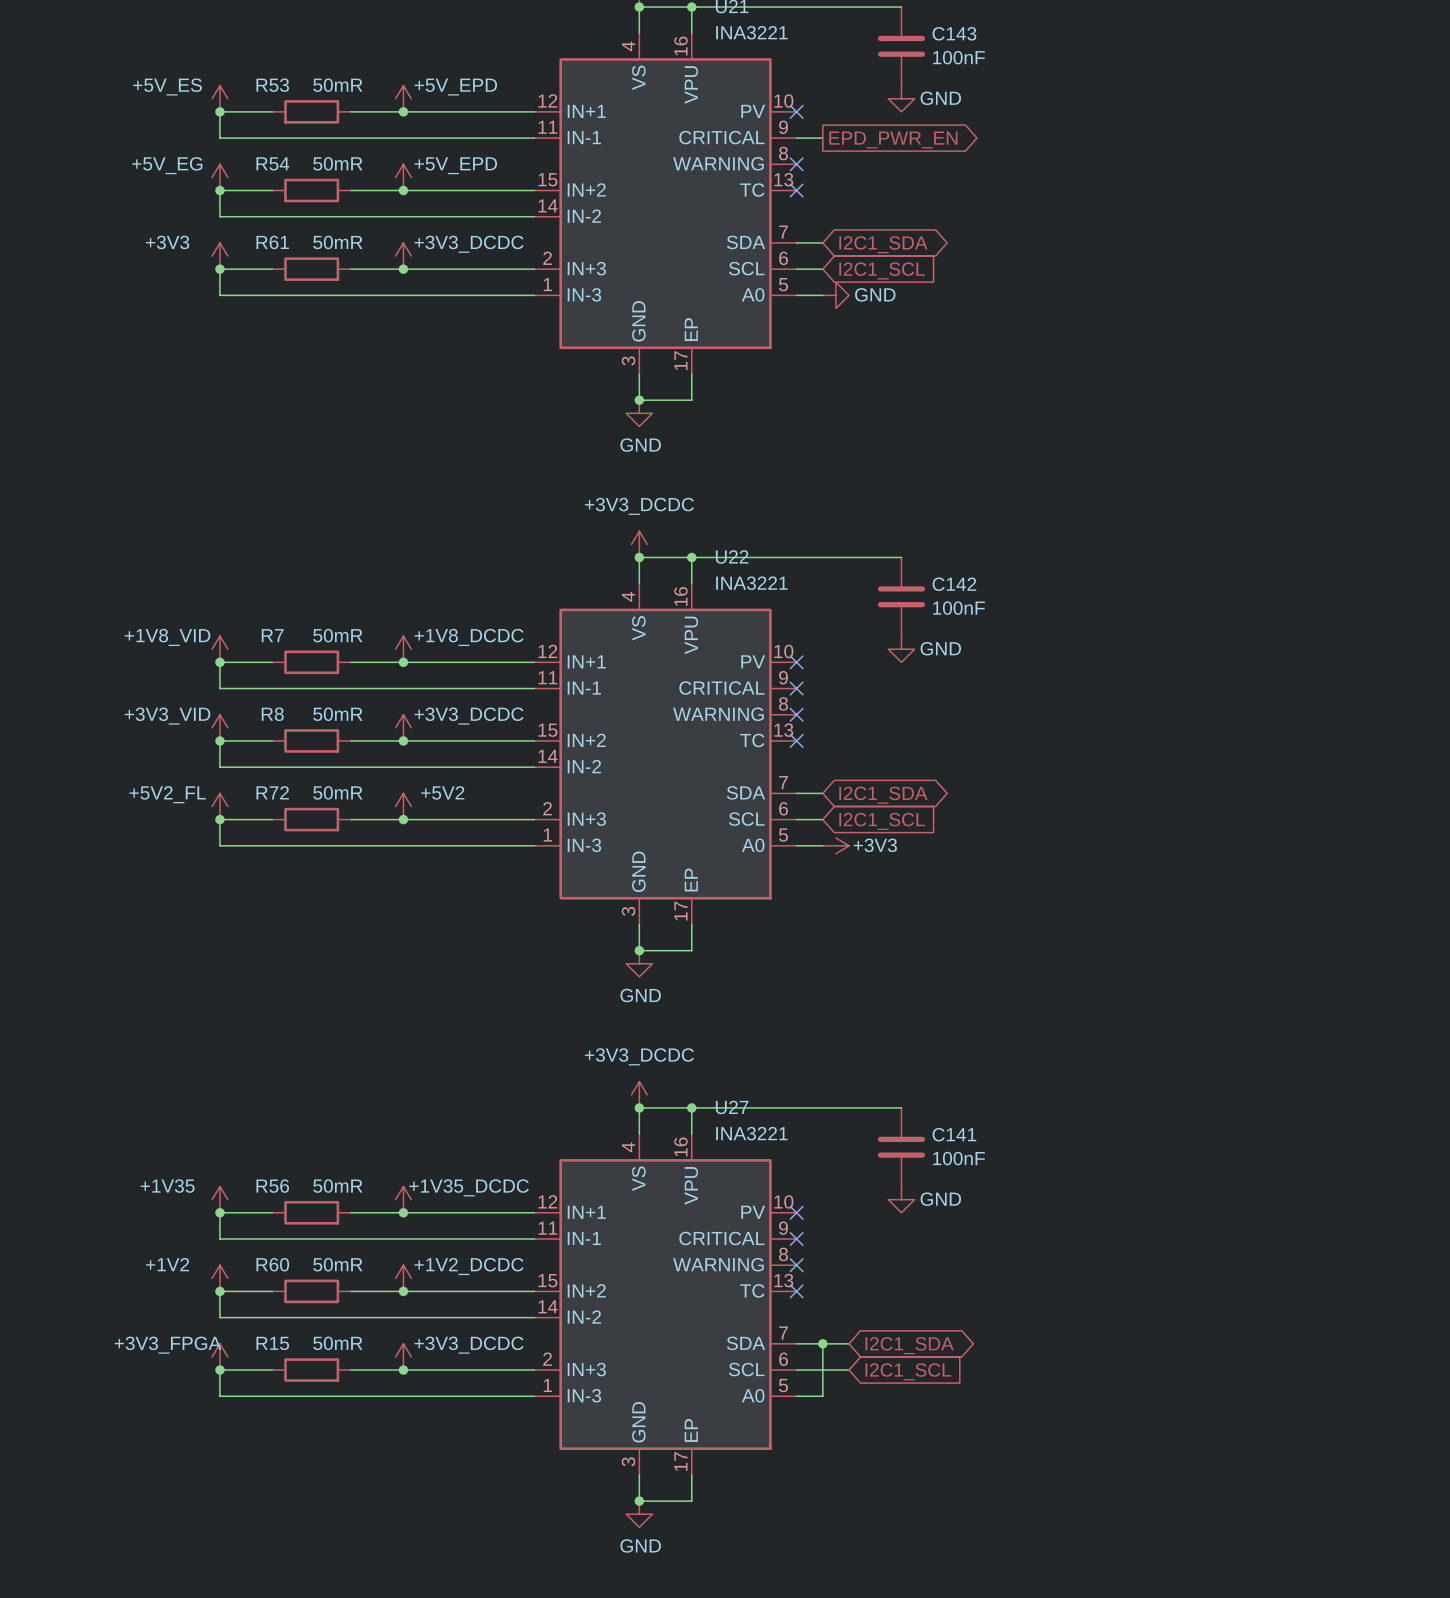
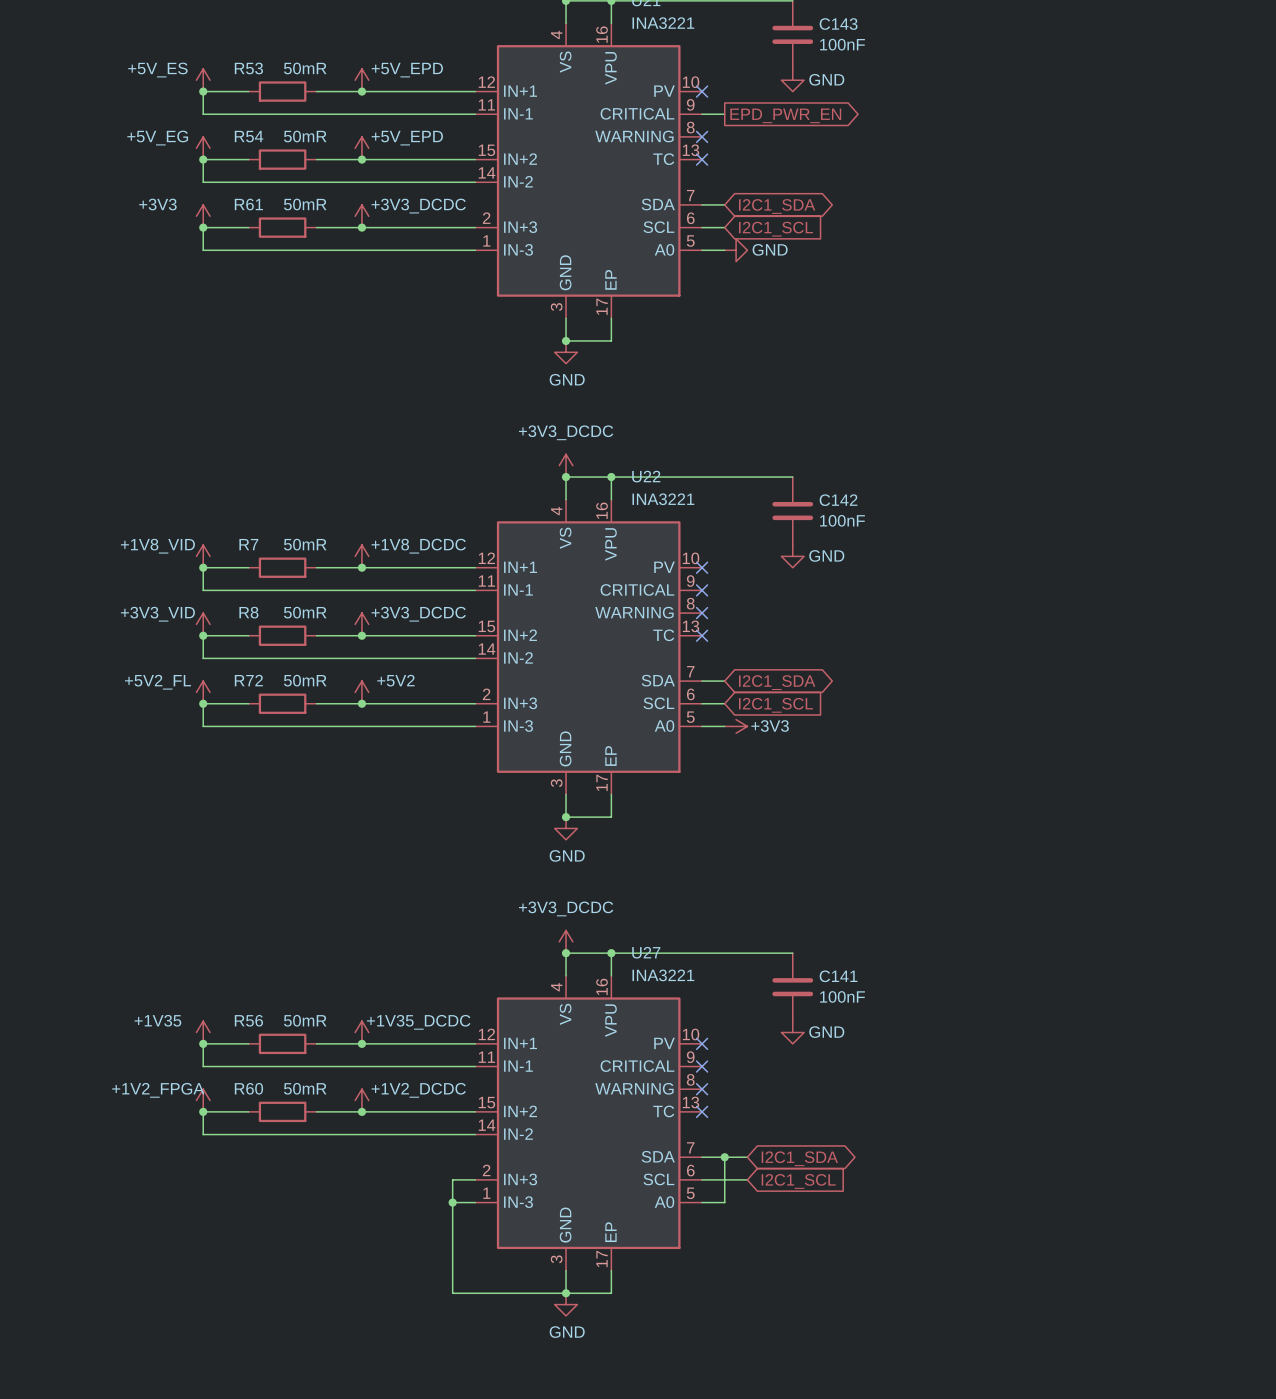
power symbol: +1V2 (219, 1278) -> +1V2_FPGA (203, 1100)
power symbol: +3V3_FPGA (219, 1356) -> none
power symbol: +3V3_DCDC (403, 1356) -> none
junction: (219, 1370) -> none
wire: (272, 1370) (219, 1370) (219, 1396) (508, 1396) -> none
R15: 50mR (311, 1370) -> none
wire: (351, 1370) (508, 1370) -> (566, 1293) (452, 1293) (452, 1179)
junction: (403, 1370) -> none
junction: none -> (452, 1202)

